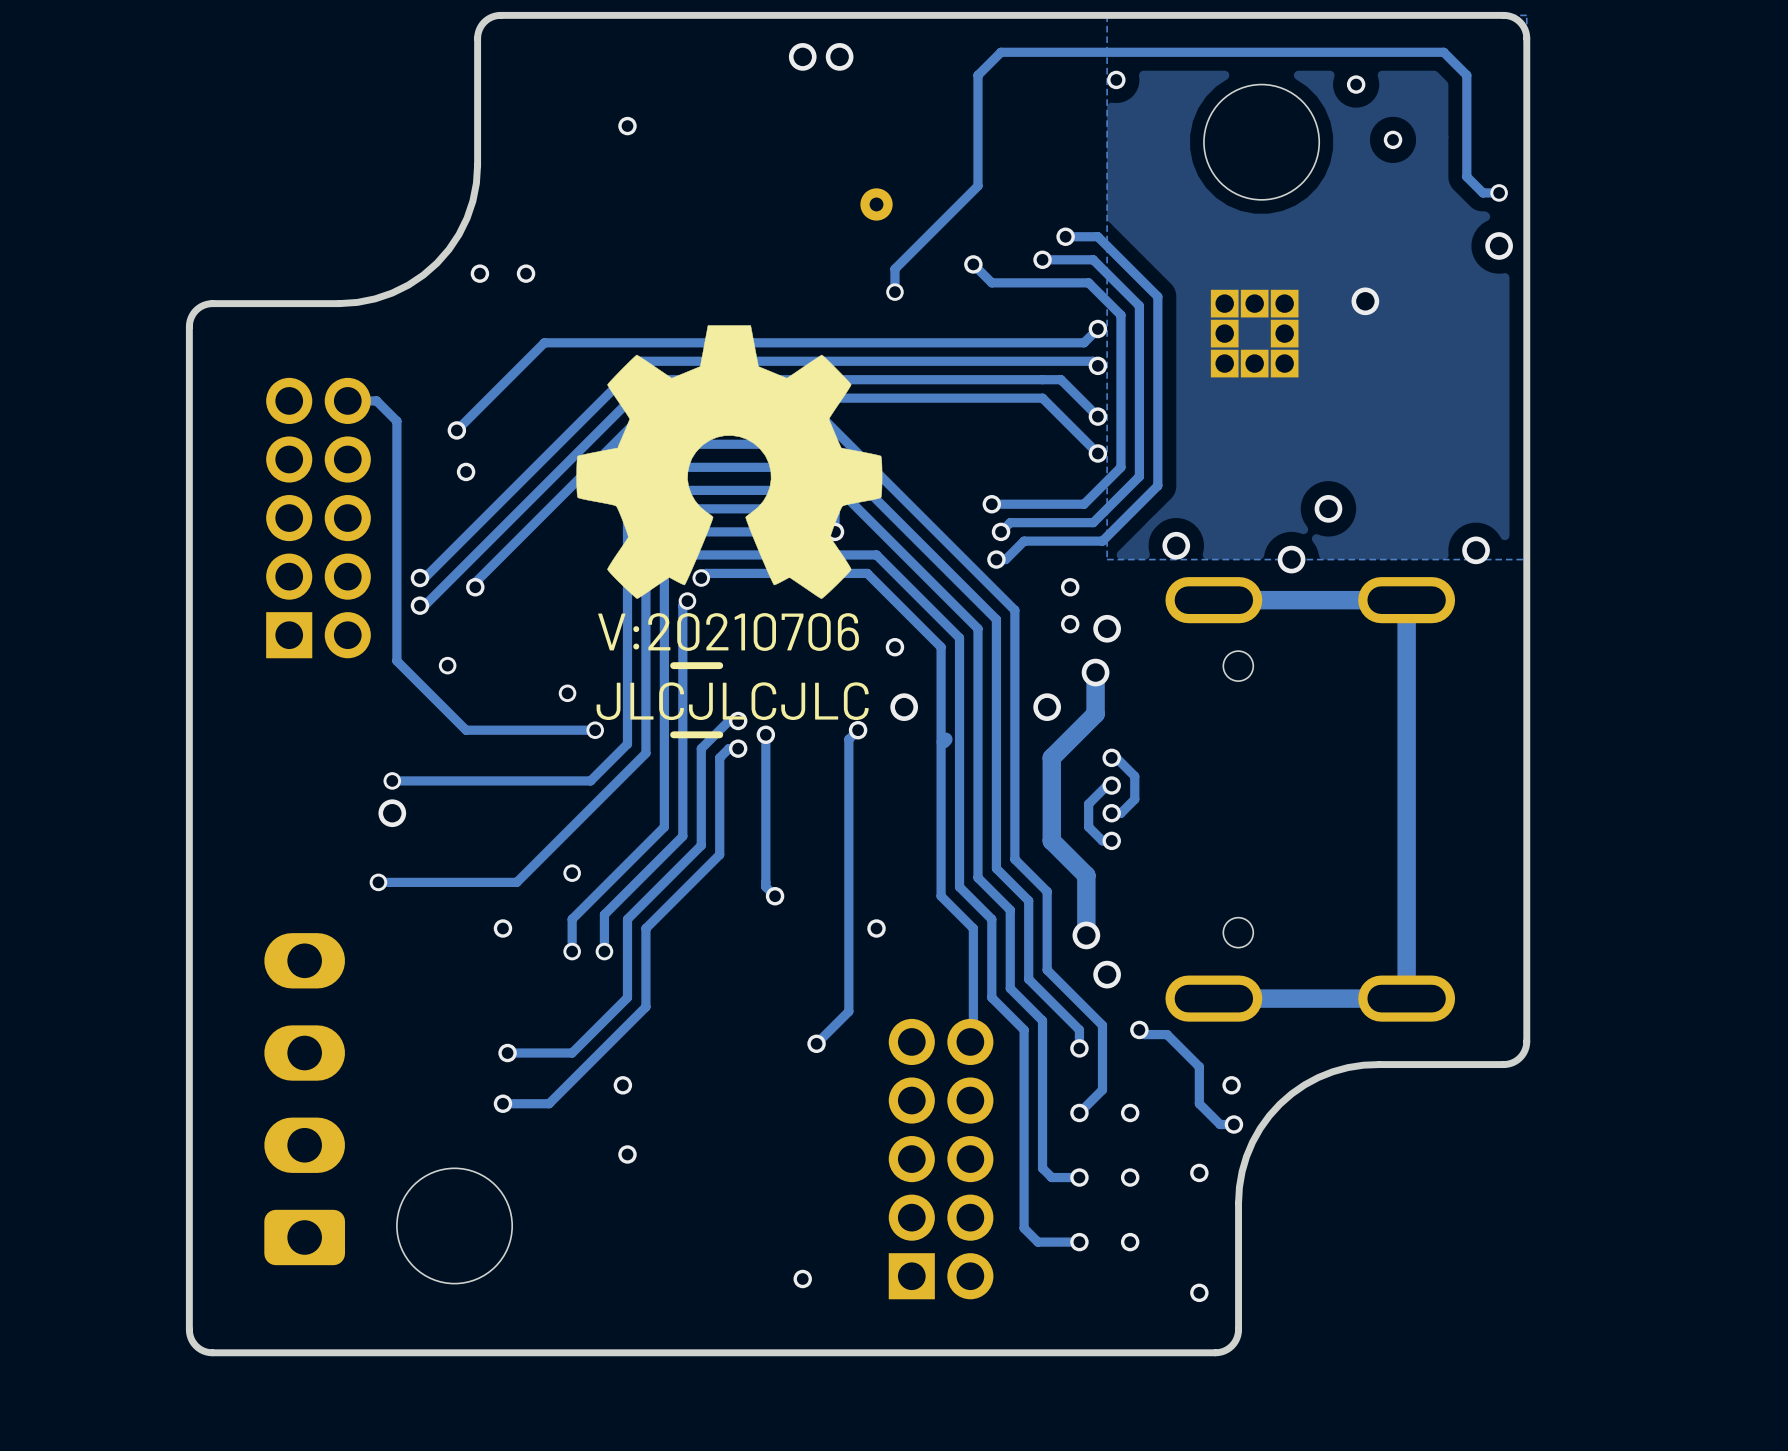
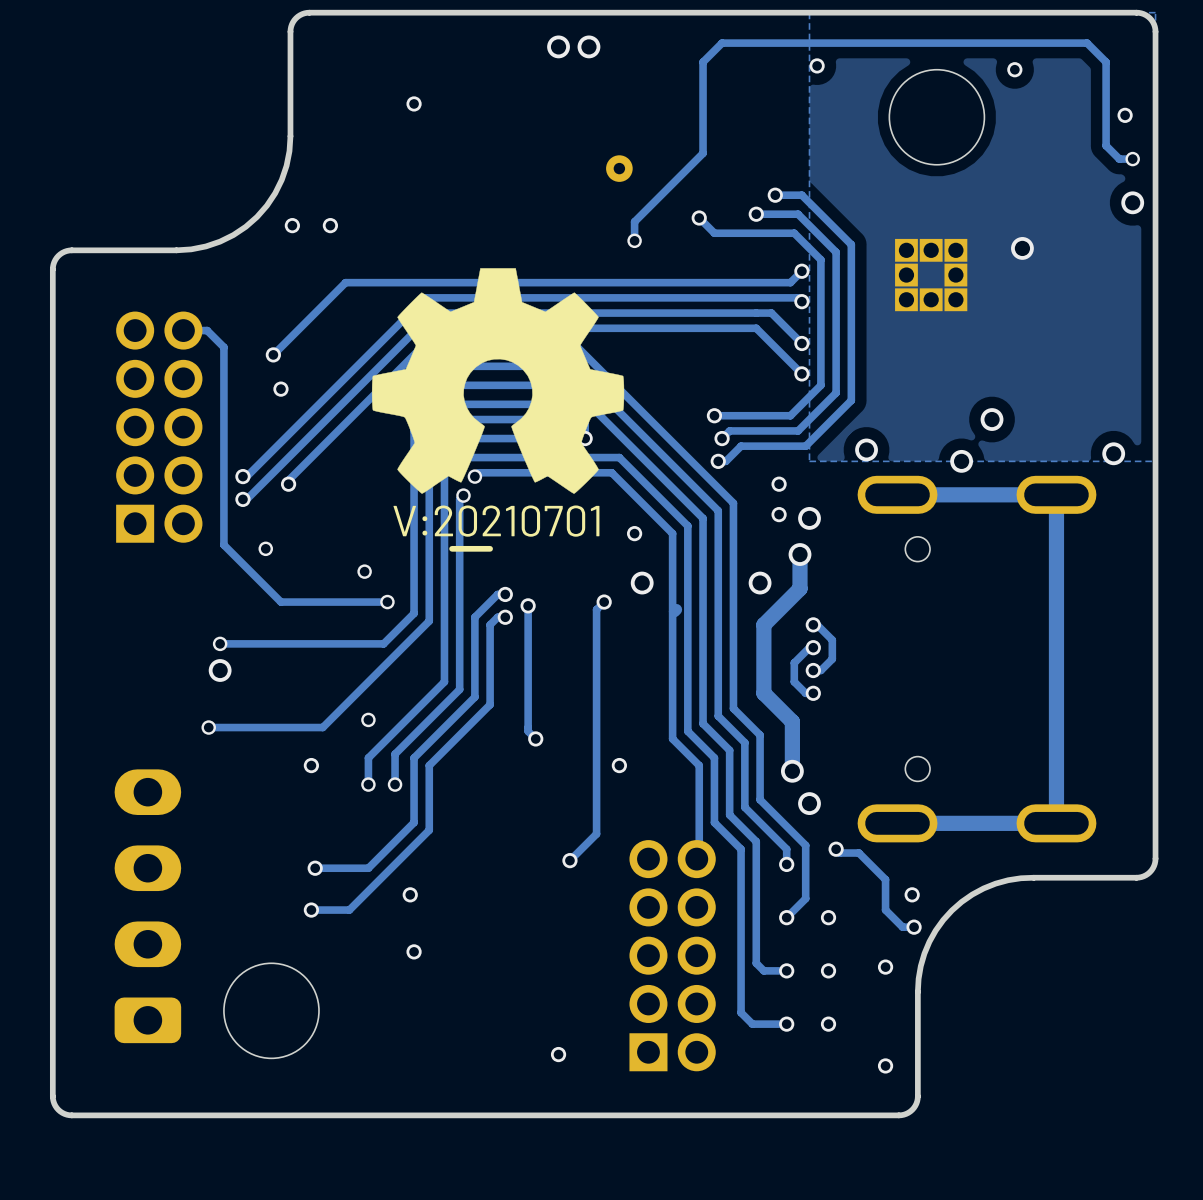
via position: (1393, 139) -> (1125, 115)
drawing shape: [598, 613, 859, 670] -> [393, 505, 600, 552]
drawing: [670, 731, 724, 739] -> none

